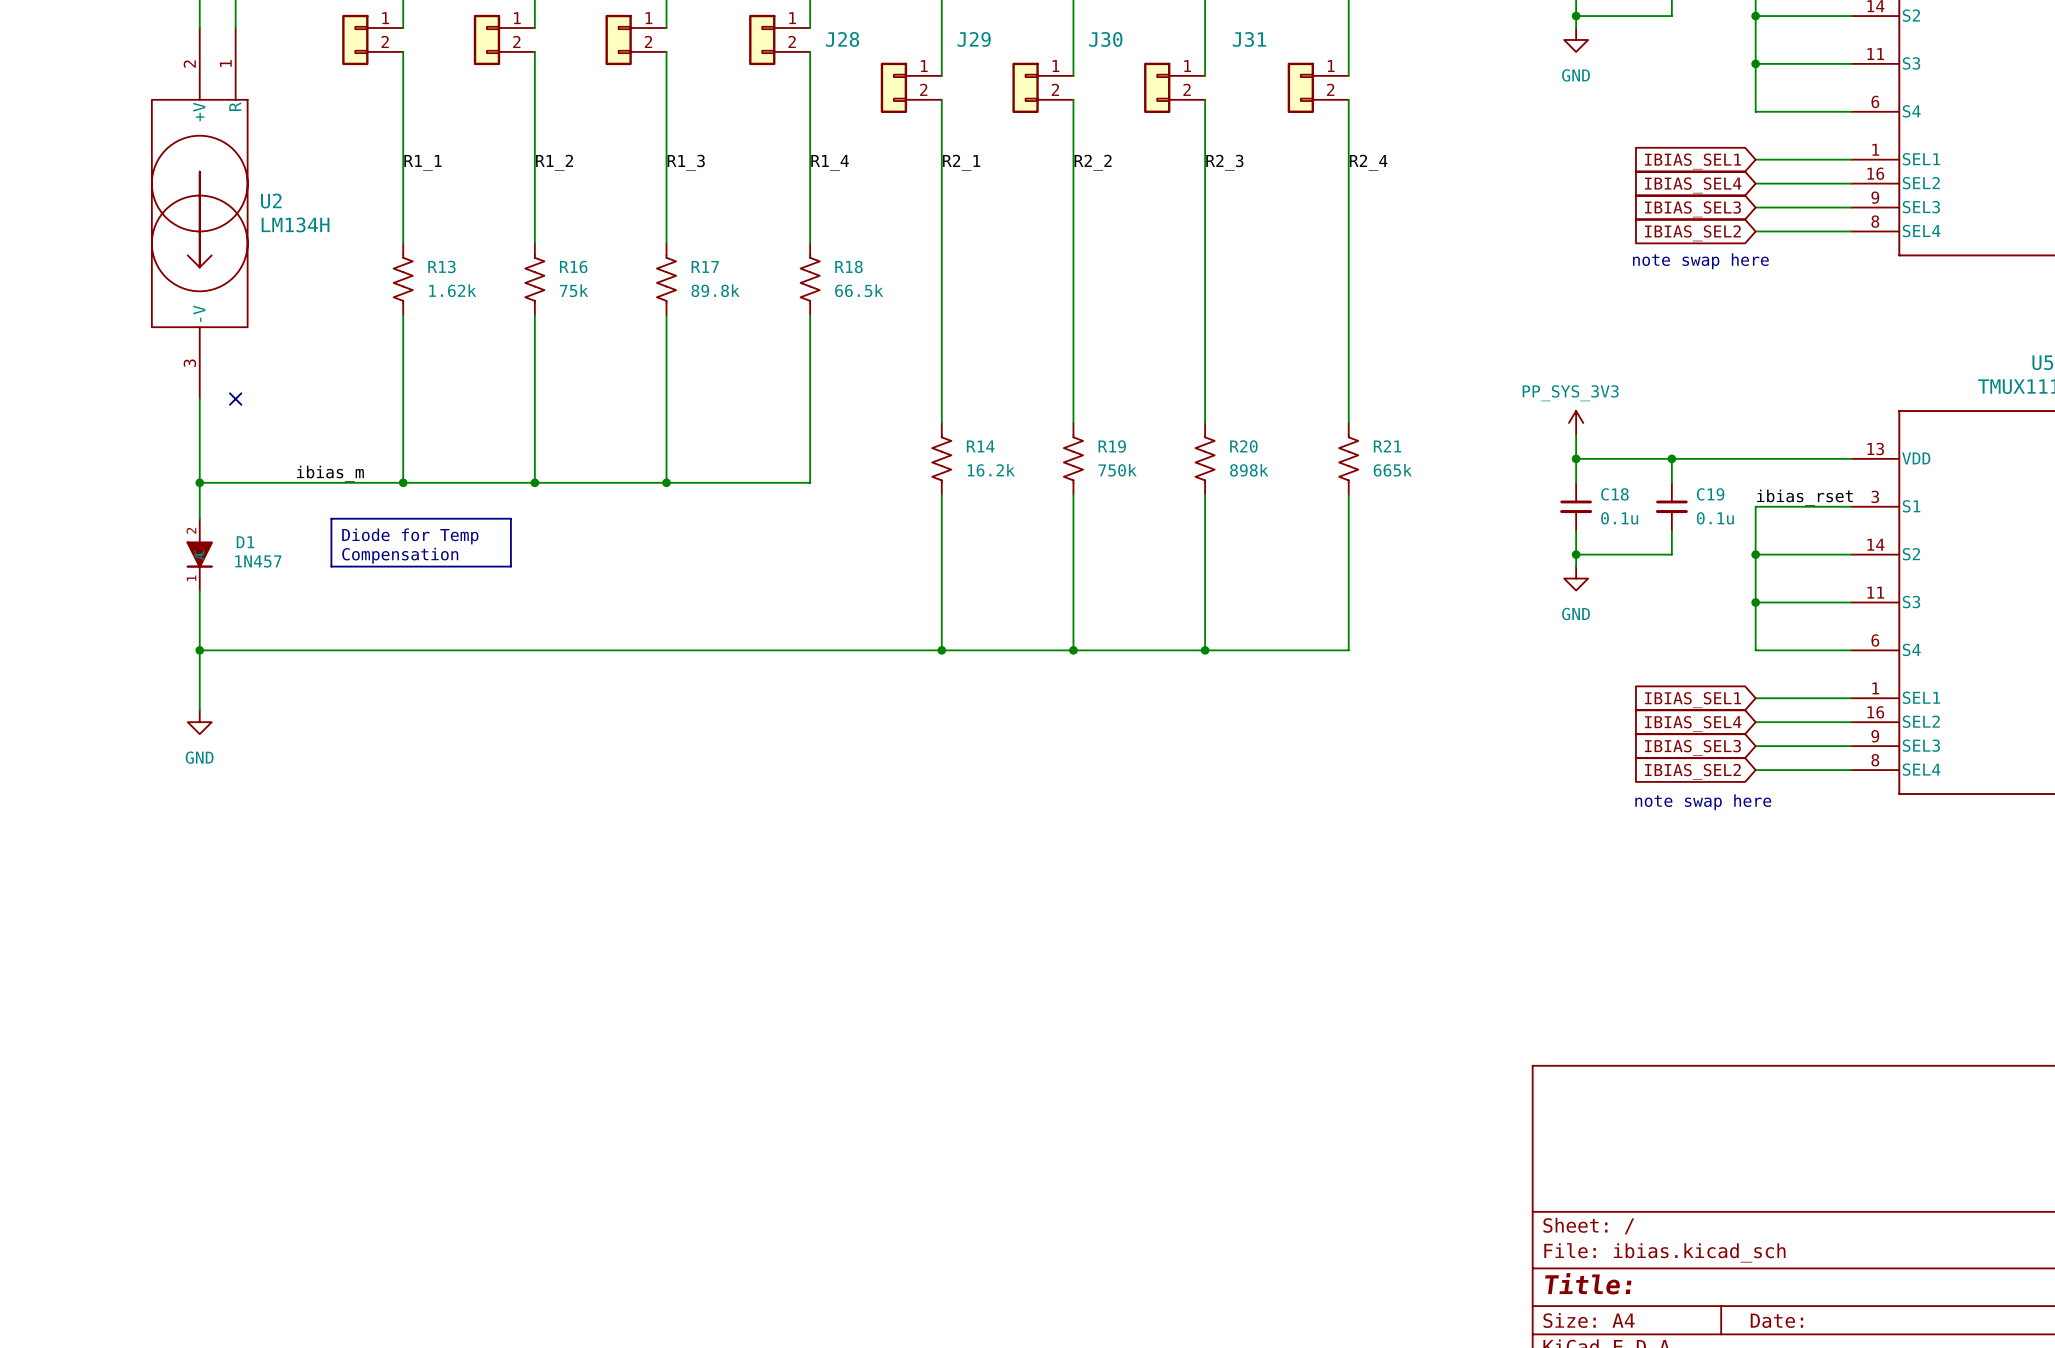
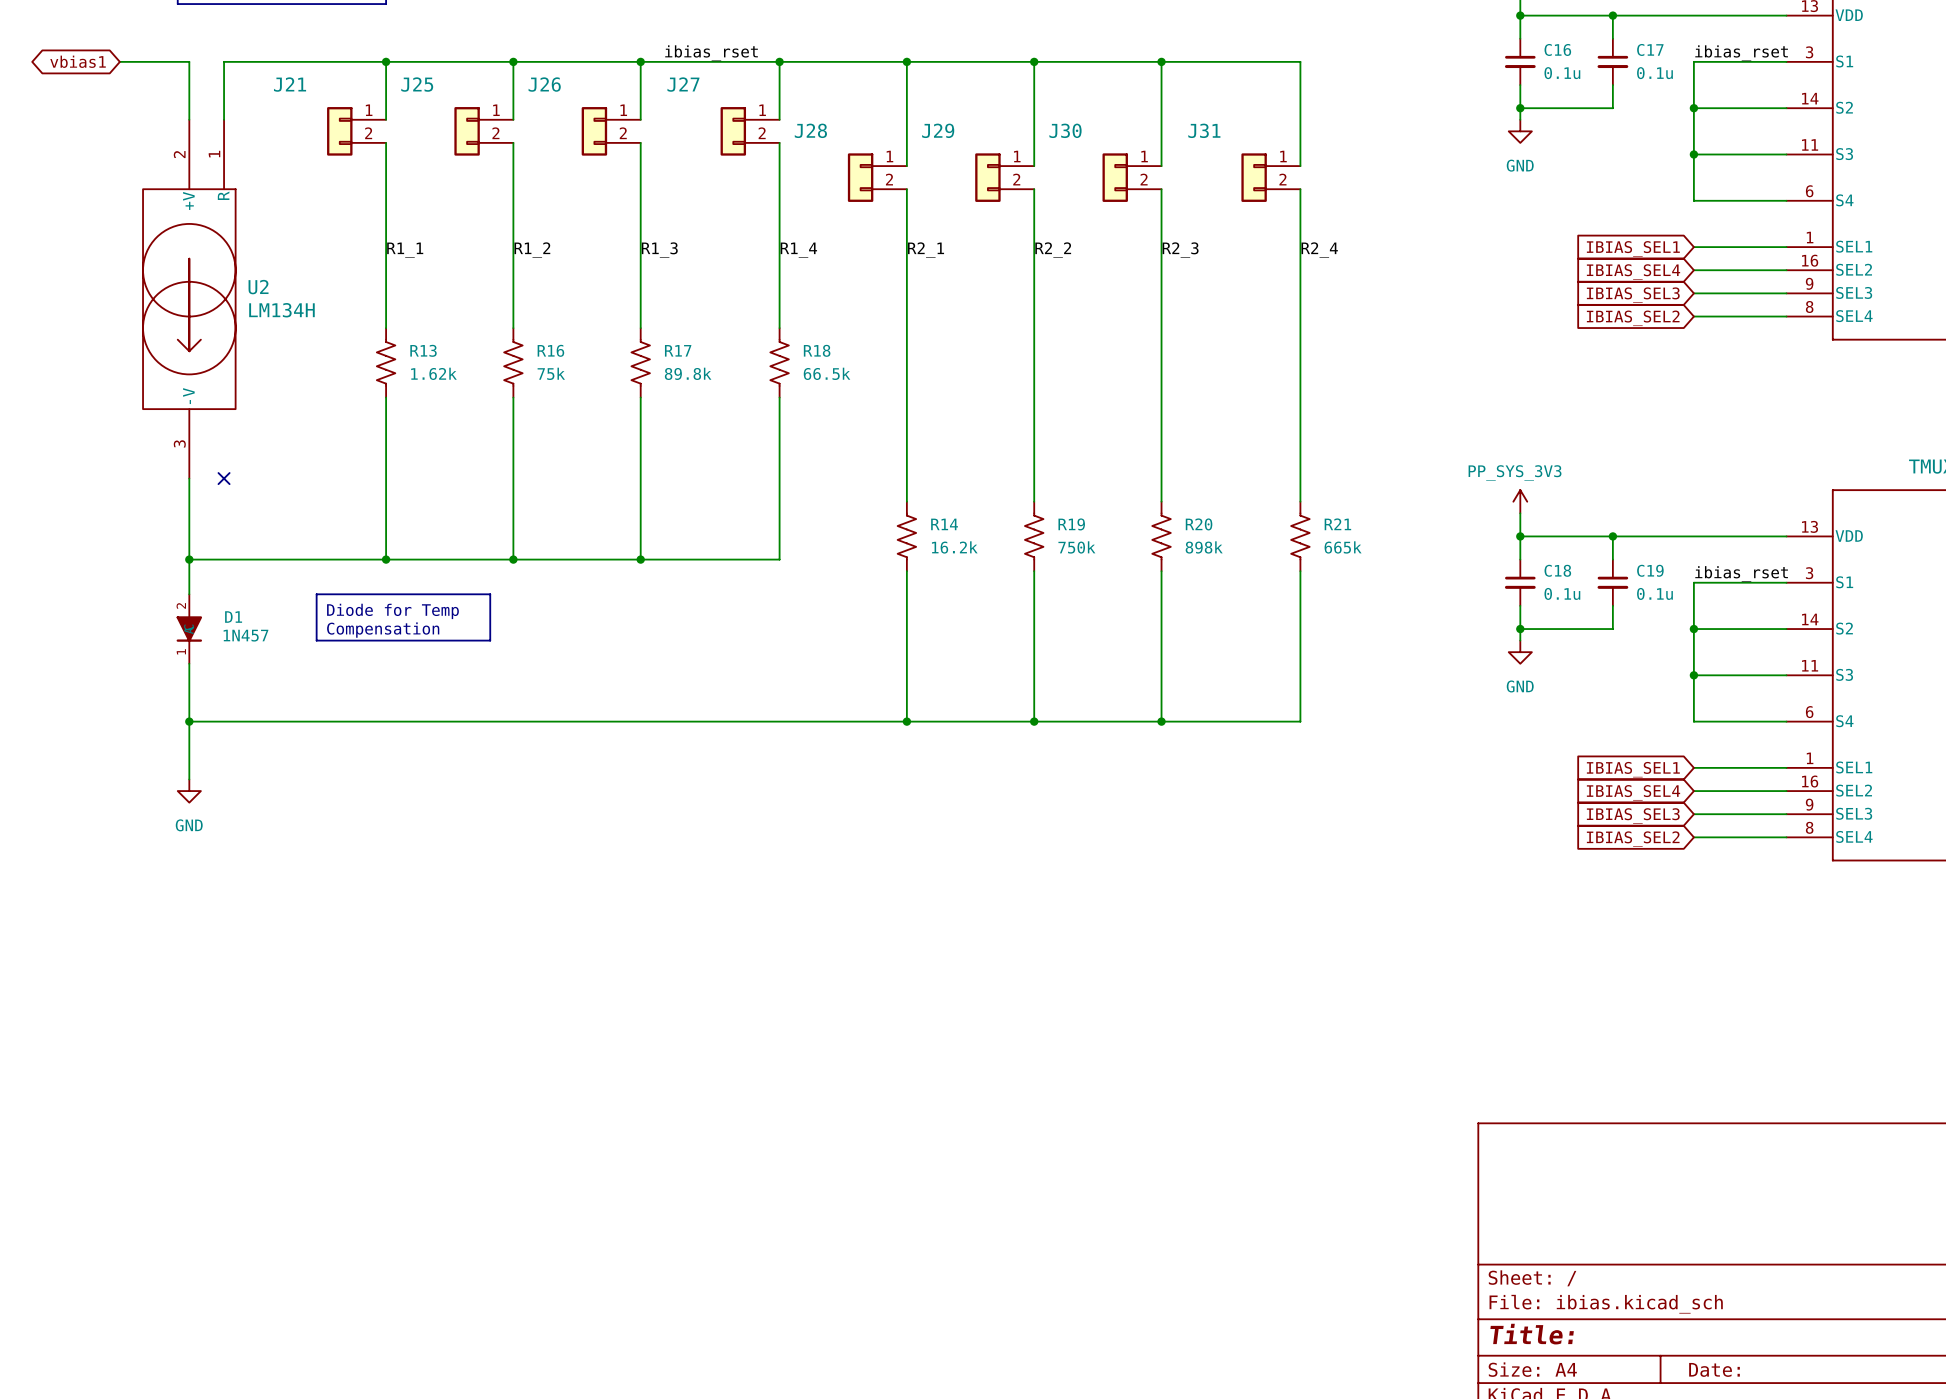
text: note swap here (1700, 261) -> none
label: ibias_m (330, 473) -> none
text: note swap here (1703, 802) -> none

